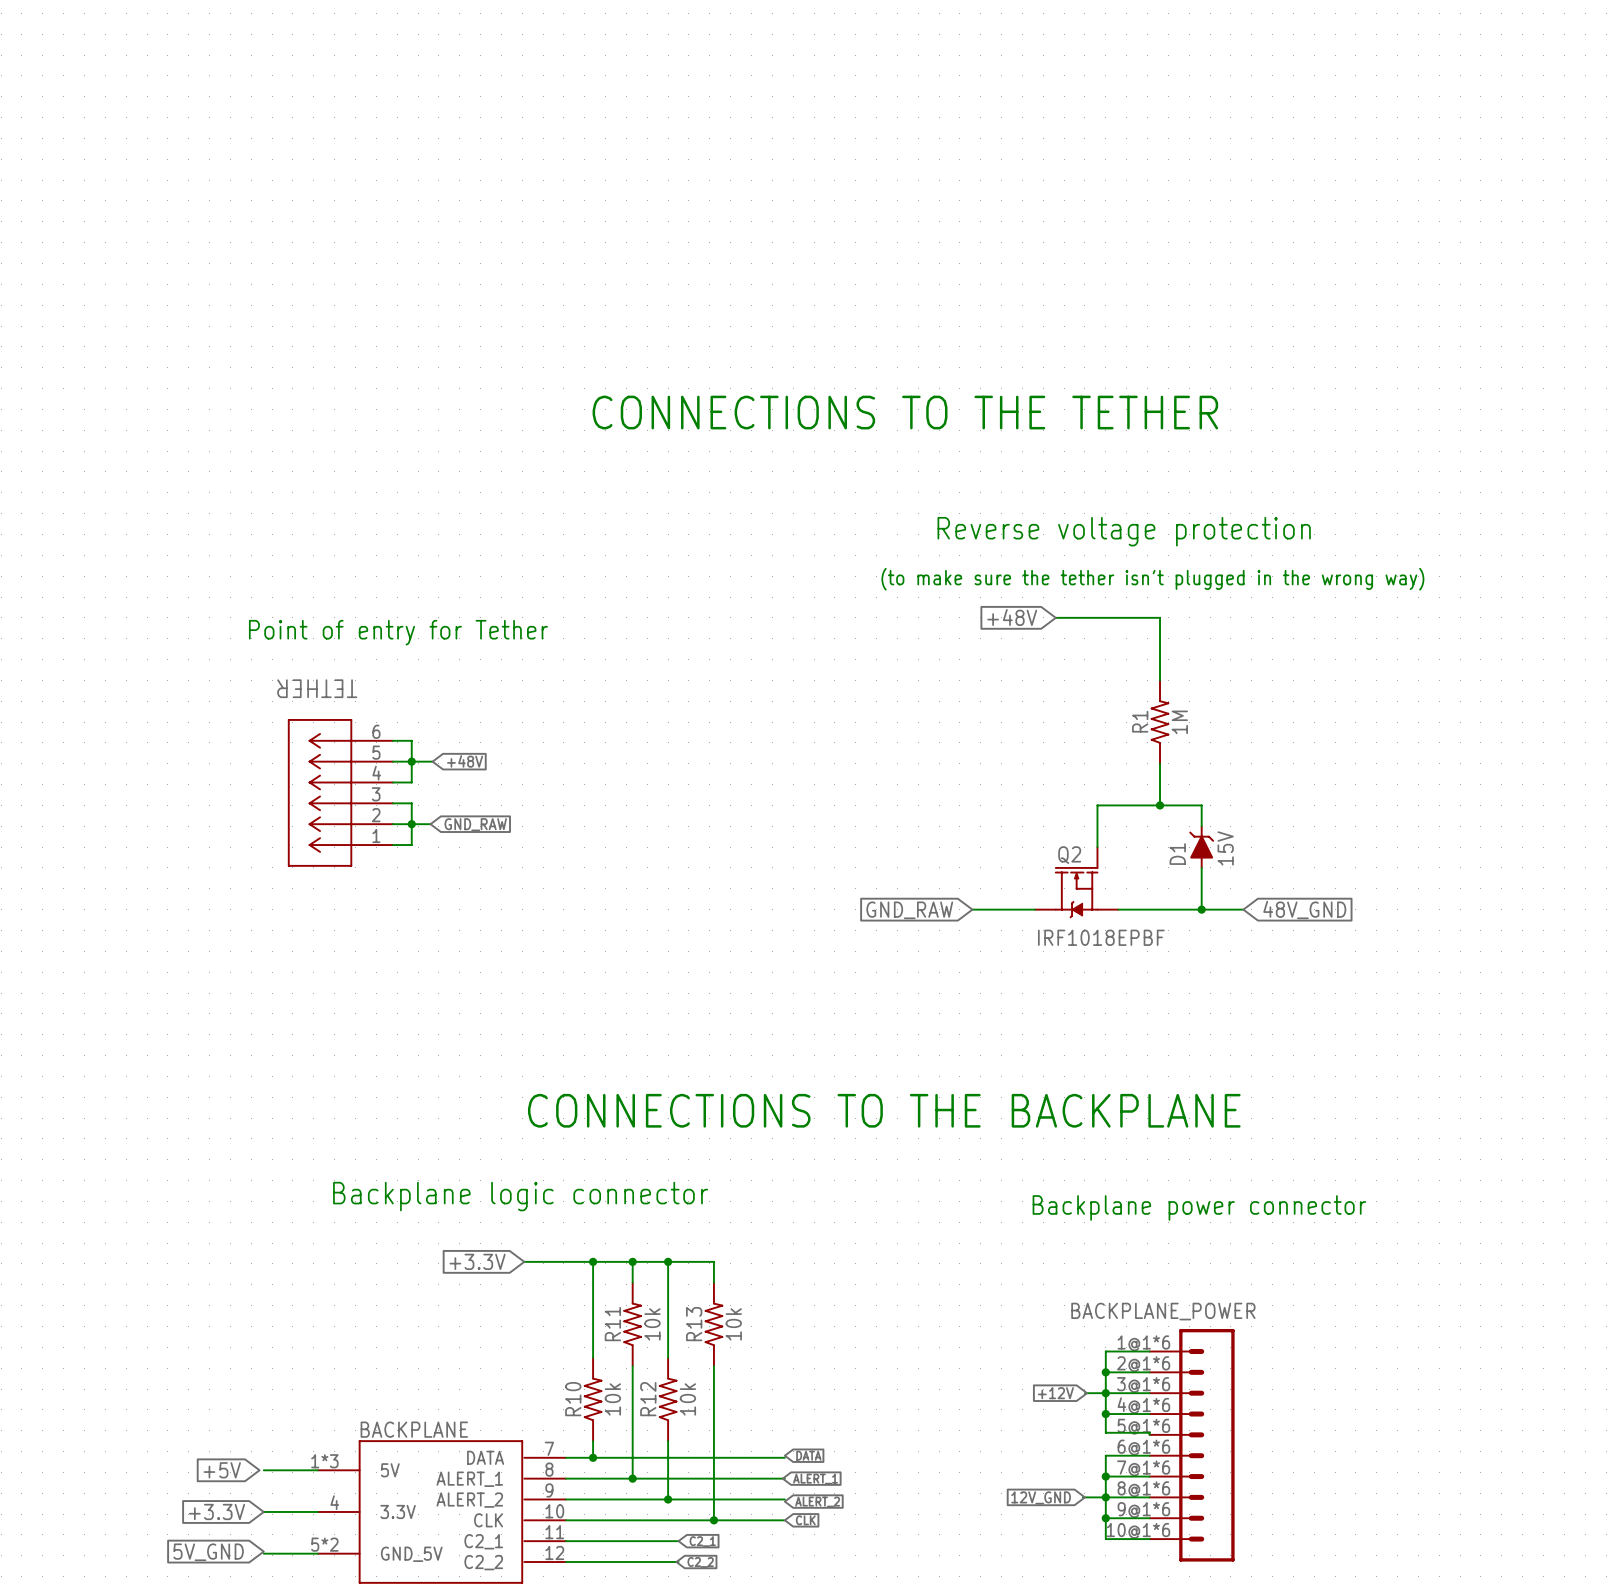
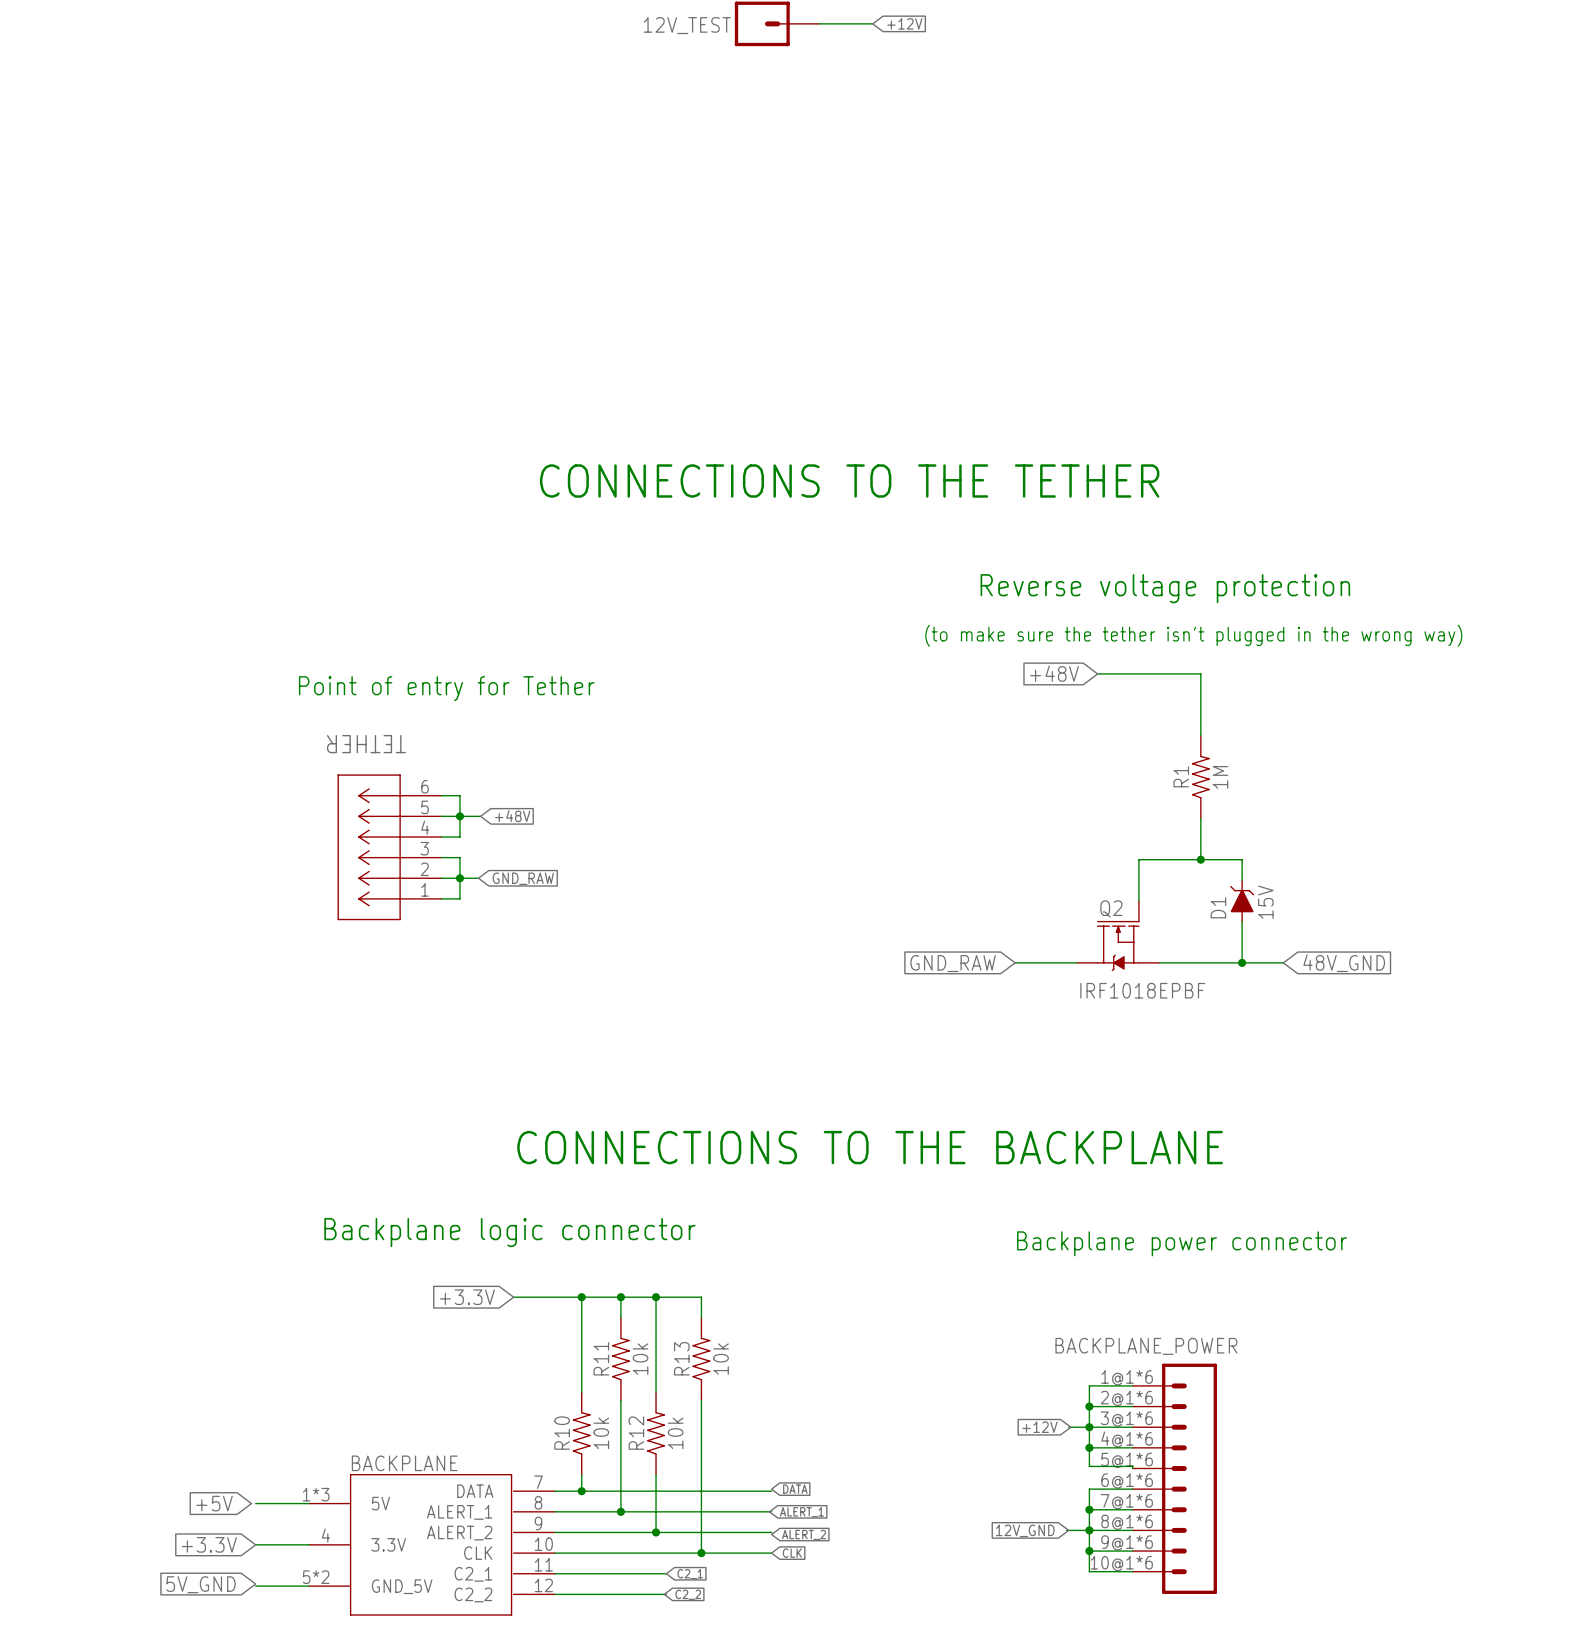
text position: CONNECTIONS TO THE TETHER (905, 412) -> CONNECTIONS TO THE TETHER (849, 481)
text position: Reverse voltage protection (1124, 531) -> Reverse voltage protection (1165, 588)
text position: (to make sure the tether isn't plugged in the wrong way) (1152, 579) -> (to make sure the tether isn't plugged in the wrong way) (1193, 635)
global label position: +48V (1012, 617) -> +48V (1054, 673)
wire: (1055, 617) (1160, 617) (1160, 680) -> (1097, 673) (1200, 673) (1200, 735)
text position: Point of entry for Tether (398, 632) -> Point of entry for Tether (446, 688)
R1 position: (1160, 722) -> (1200, 777)
wire: (392, 740) (411, 740) (411, 782) (392, 782) -> (441, 795) (459, 795) (459, 836) (441, 836)
wire: (392, 761) (432, 761) -> (441, 816) (480, 816)
junction: (411, 761) -> none
global label position: +48V (465, 761) -> +48V (512, 816)
wire: (1160, 763) (1160, 805) -> (1200, 818) (1200, 859)
junction: none -> (459, 816)
TETHER position: (340, 792) -> (389, 847)
wire: (392, 803) (411, 803) (411, 845) (392, 845) -> (441, 857) (459, 857) (459, 898) (441, 898)
junction: (1160, 805) -> none
junction: none -> (1200, 859)
wire: (392, 824) (430, 824) -> (441, 878) (478, 878)
junction: (411, 824) -> none
global label position: GND_RAW (475, 824) -> GND_RAW (523, 878)
wire: (1201, 826) (1201, 805) (1097, 805) (1097, 847) -> (1242, 880) (1242, 859) (1138, 859) (1138, 900)
junction: none -> (459, 878)
D1 position: (1201, 847) -> (1242, 900)
wire: (1201, 867) (1201, 909) -> (1242, 921) (1242, 962)
Q2 position: (1076, 882) -> (1118, 936)
wire: (972, 909) (1034, 909) -> (1015, 962) (1077, 962)
wire: (1118, 909) (1243, 909) -> (1159, 962) (1283, 962)
junction: (1201, 909) -> none
global label position: 48V_GND (1304, 909) -> 48V_GND (1344, 963)
global label position: GND_RAW (909, 910) -> GND_RAW (953, 963)
junction: none -> (1242, 962)

